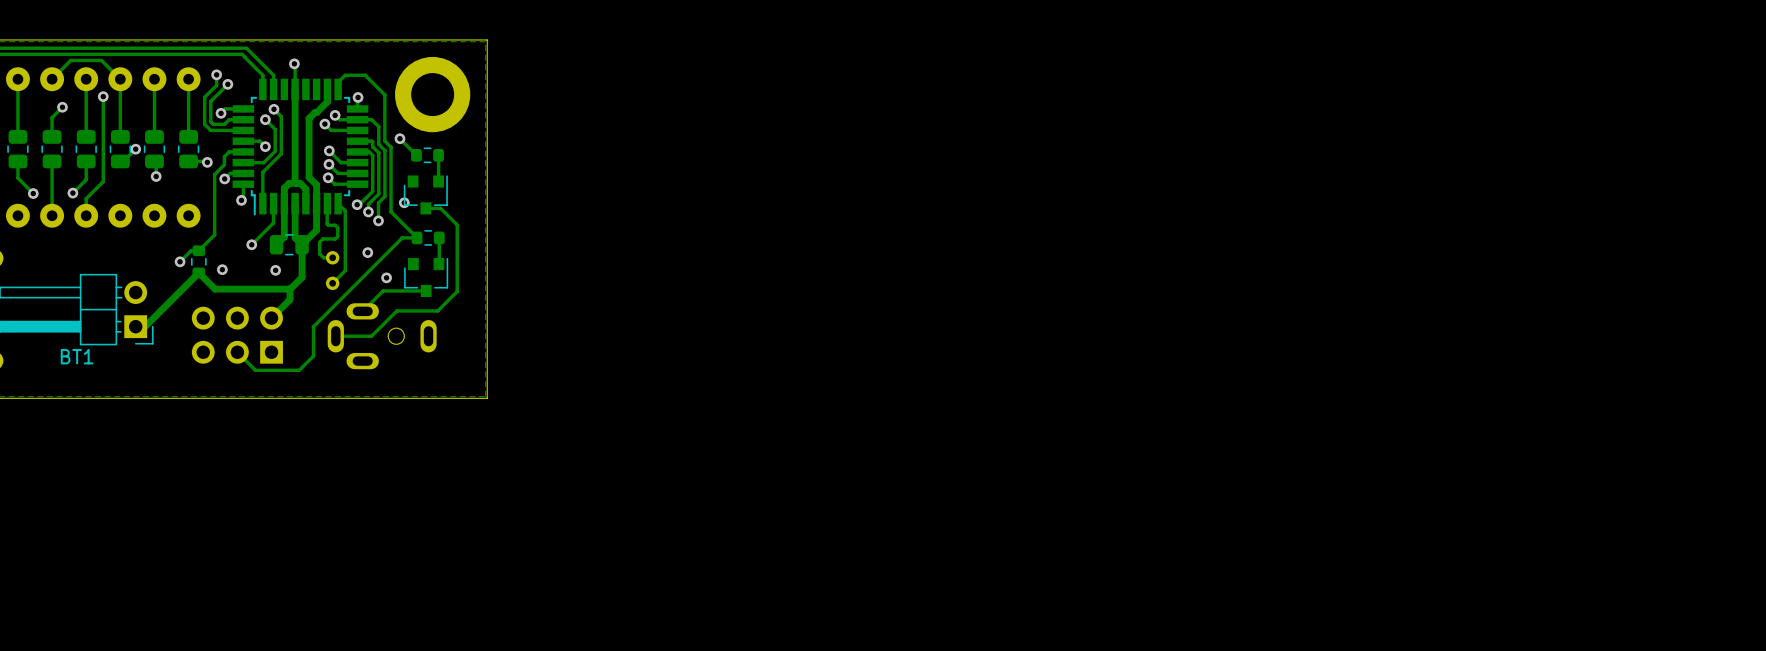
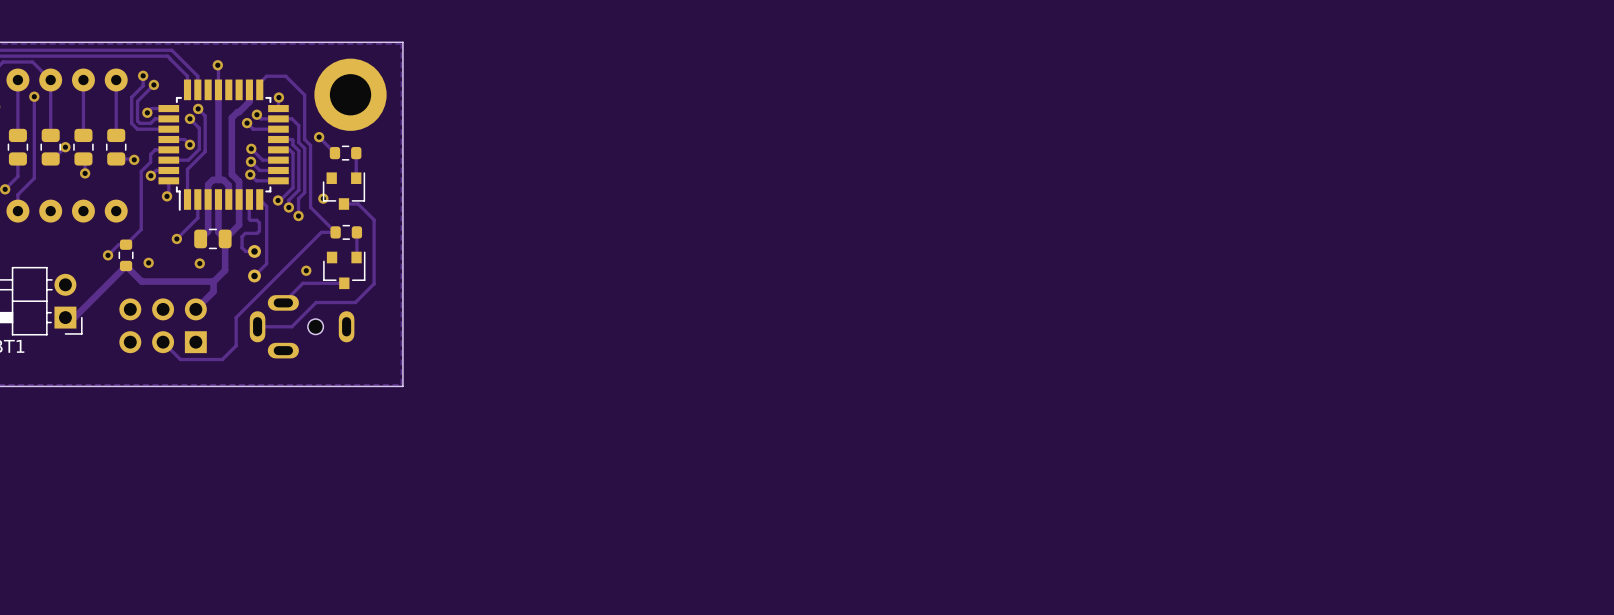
via: (367, 252) -> none

